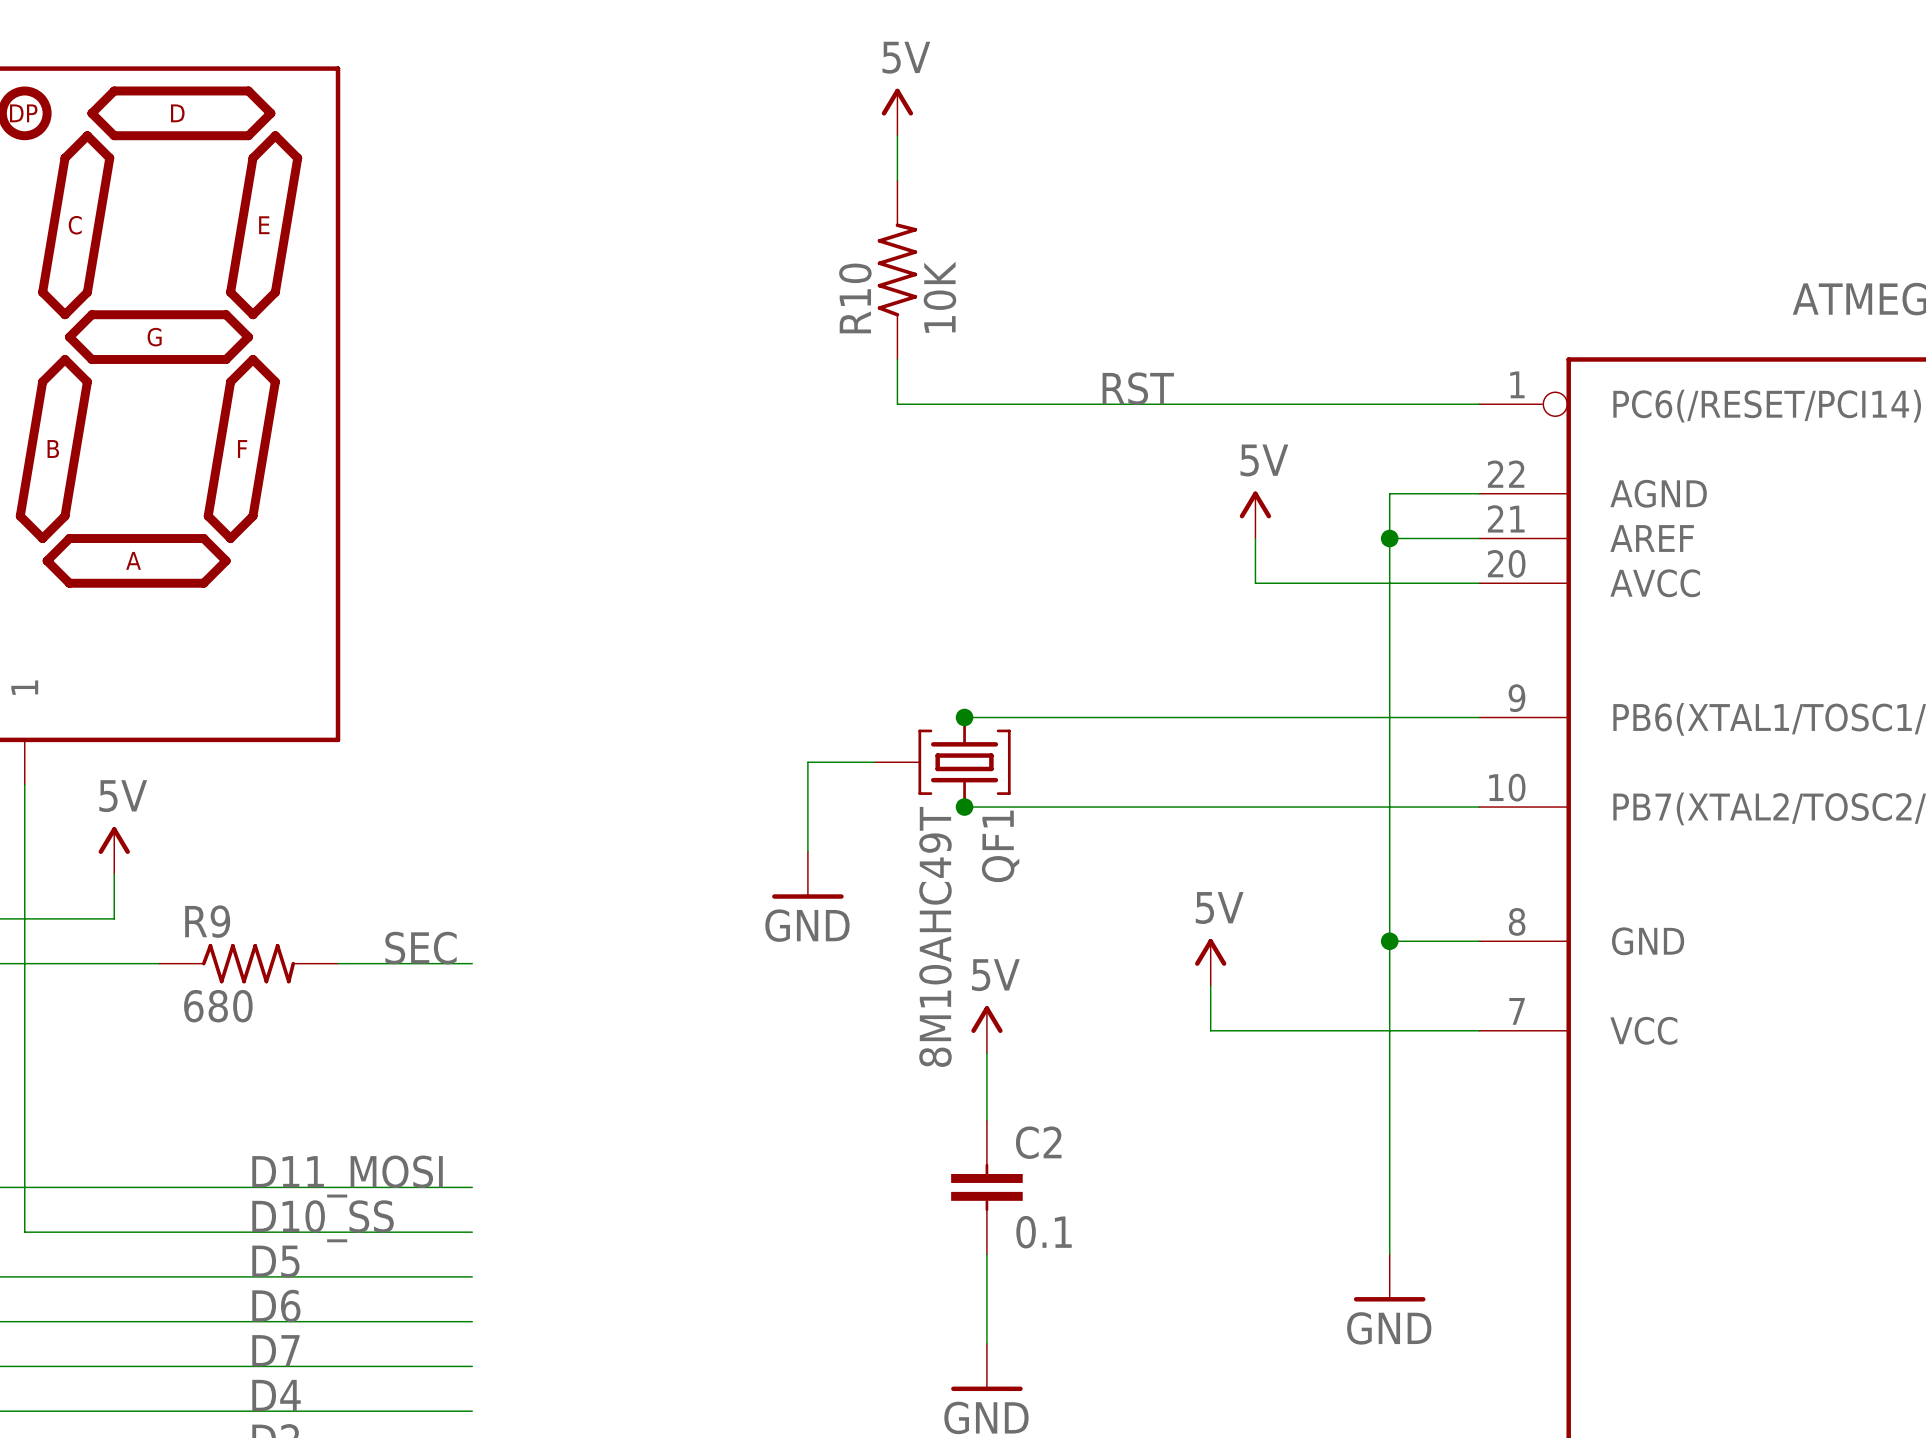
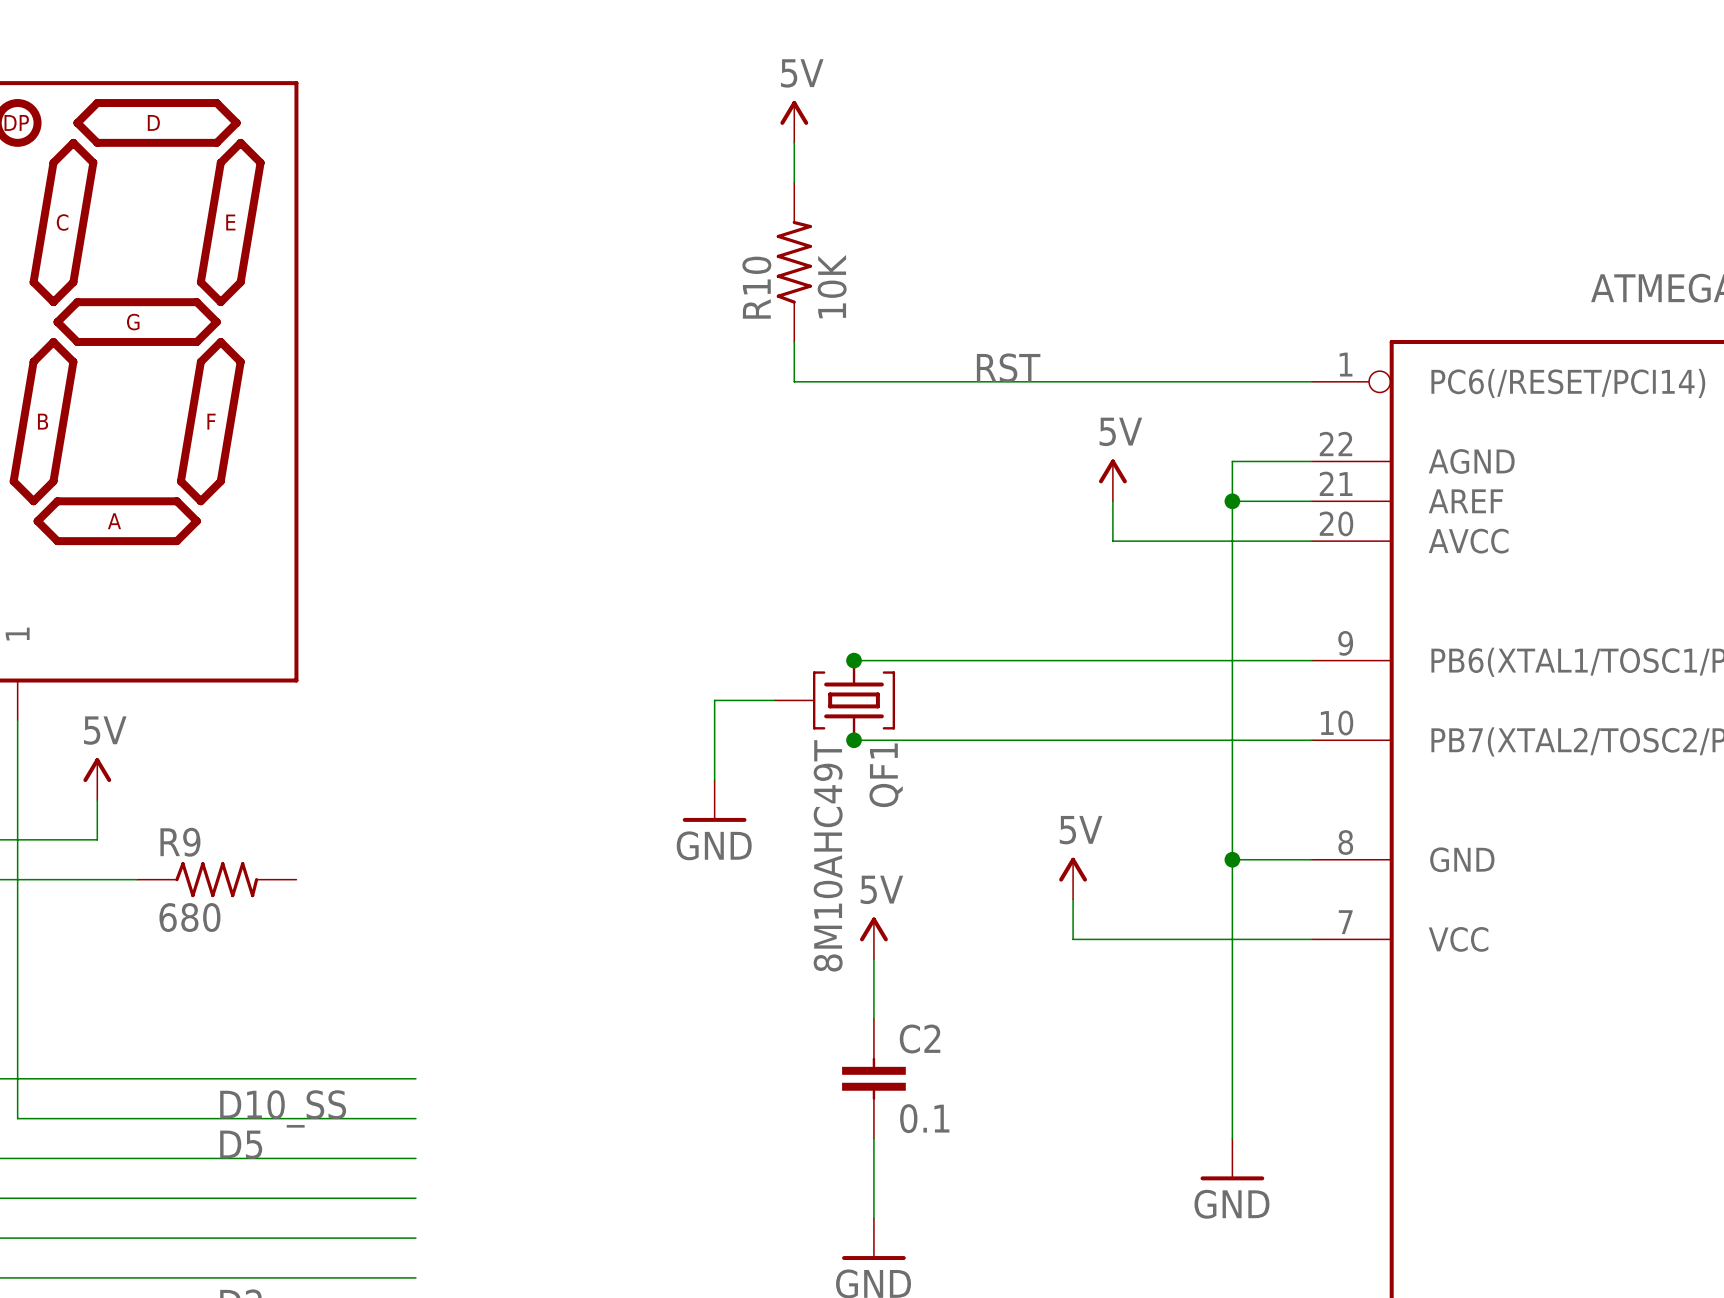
label: SEC (420, 948) -> none
wire: (338, 963) (472, 963) -> none
label: D11_MOSI (347, 1176) -> none
label: D6 (276, 1306) -> none
label: D7 (275, 1350) -> none
label: D4 (276, 1395) -> none

